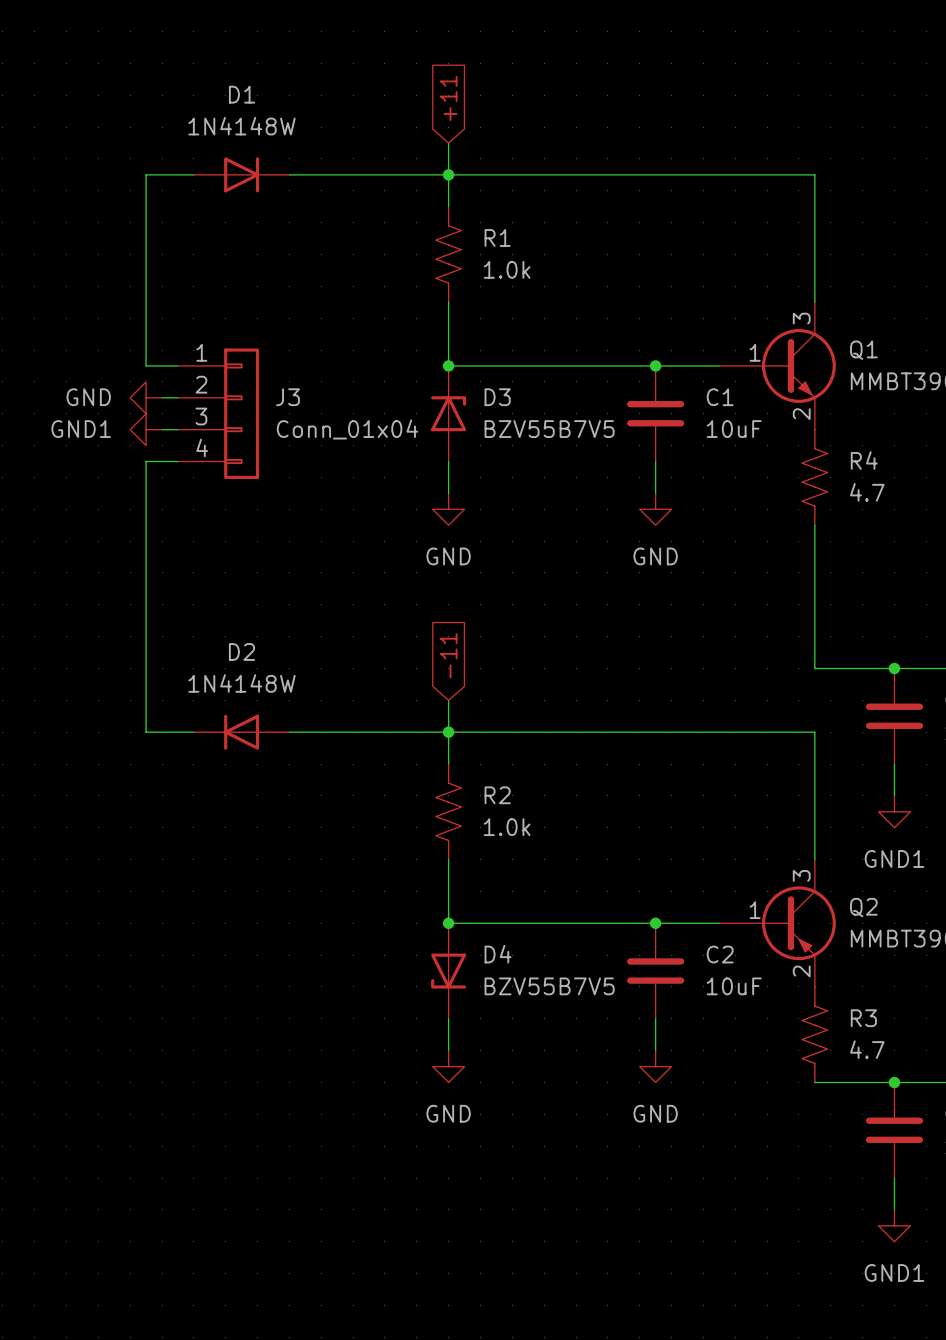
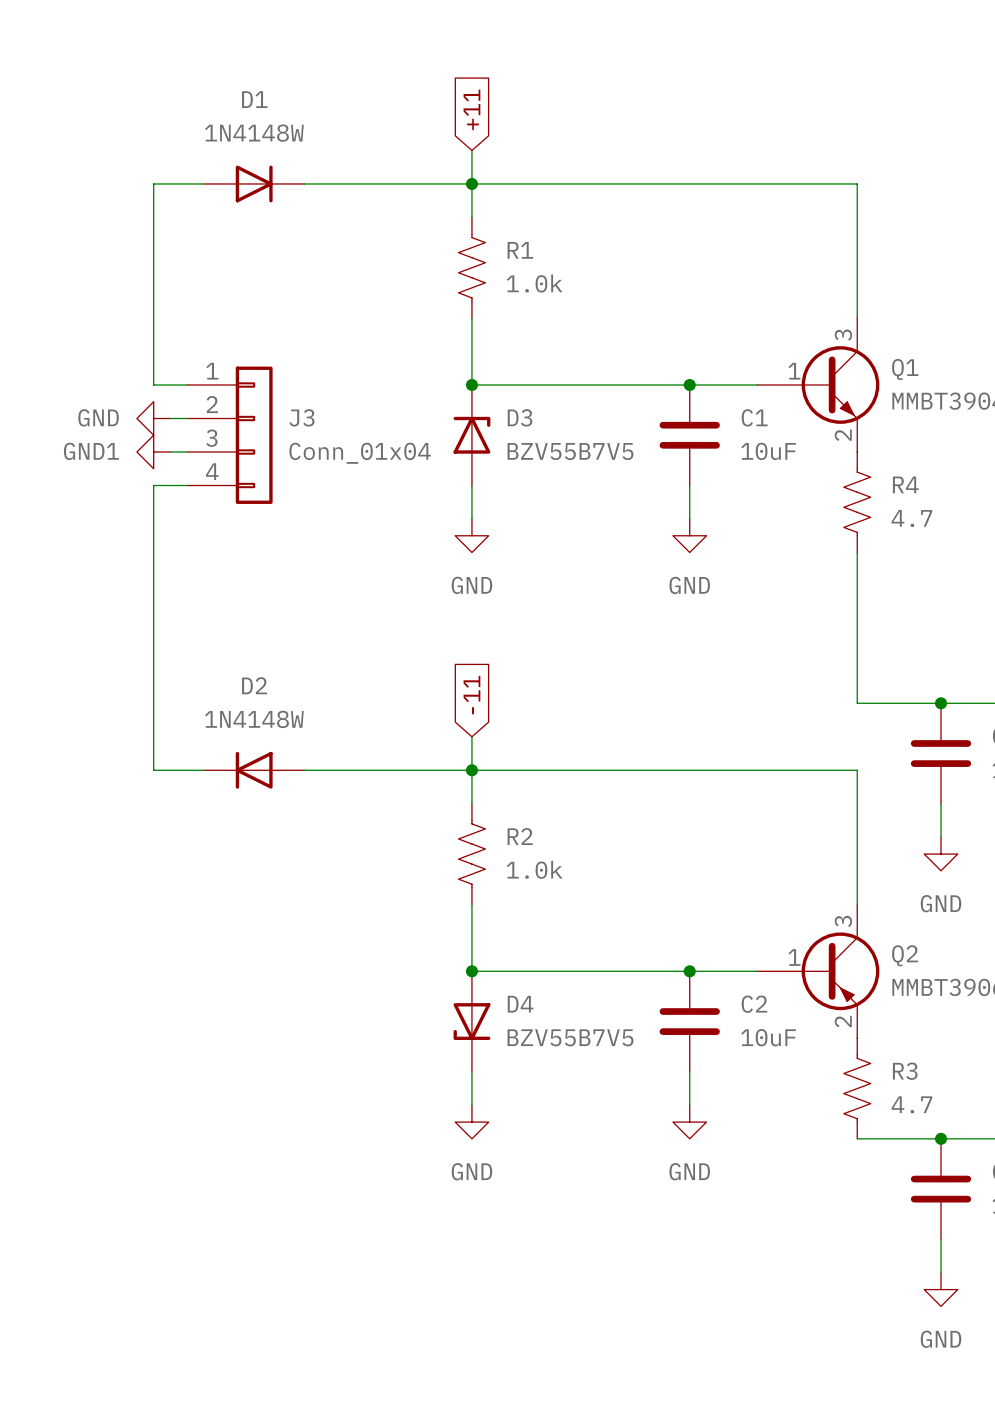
power symbol: GND1 (894, 811) -> GND (941, 854)
power symbol: GND1 (894, 1225) -> GND (941, 1289)

